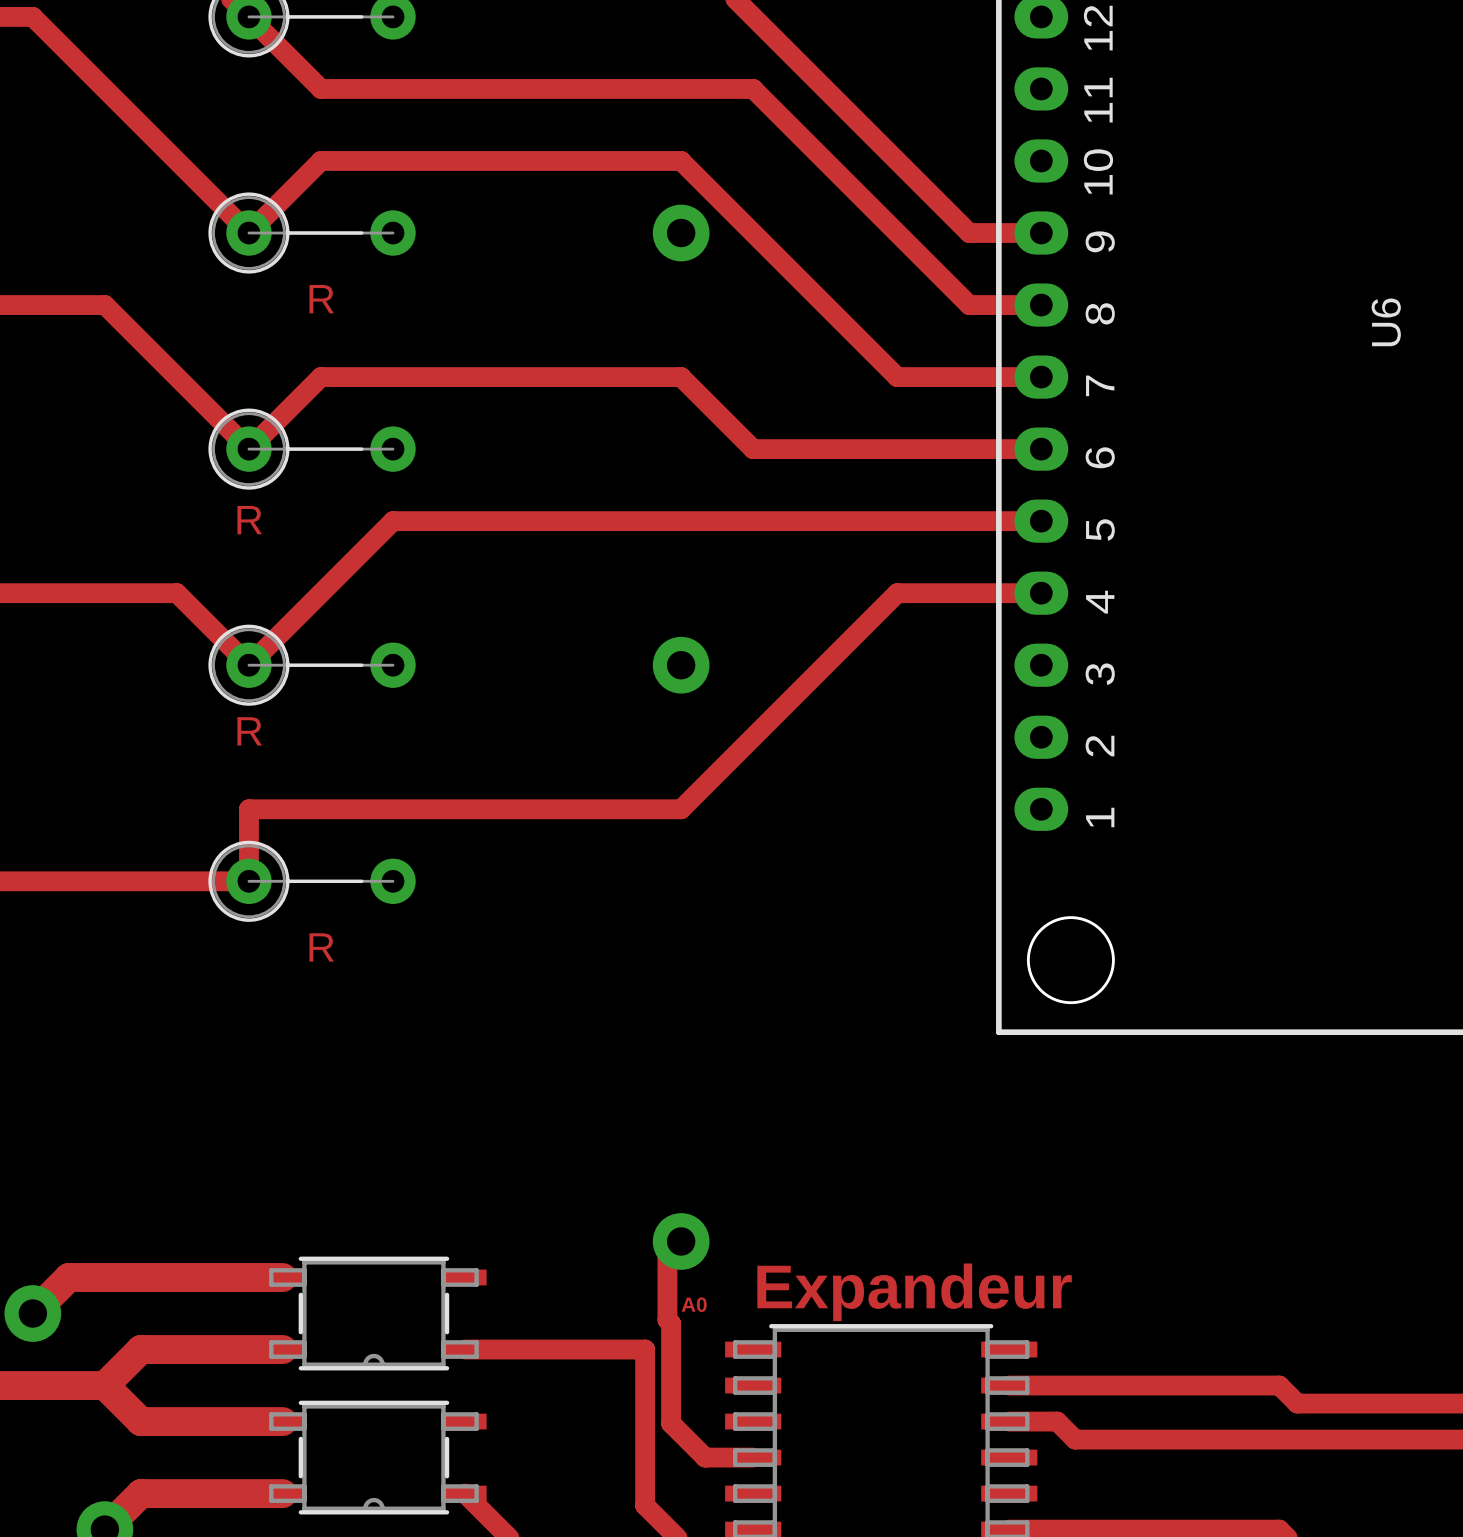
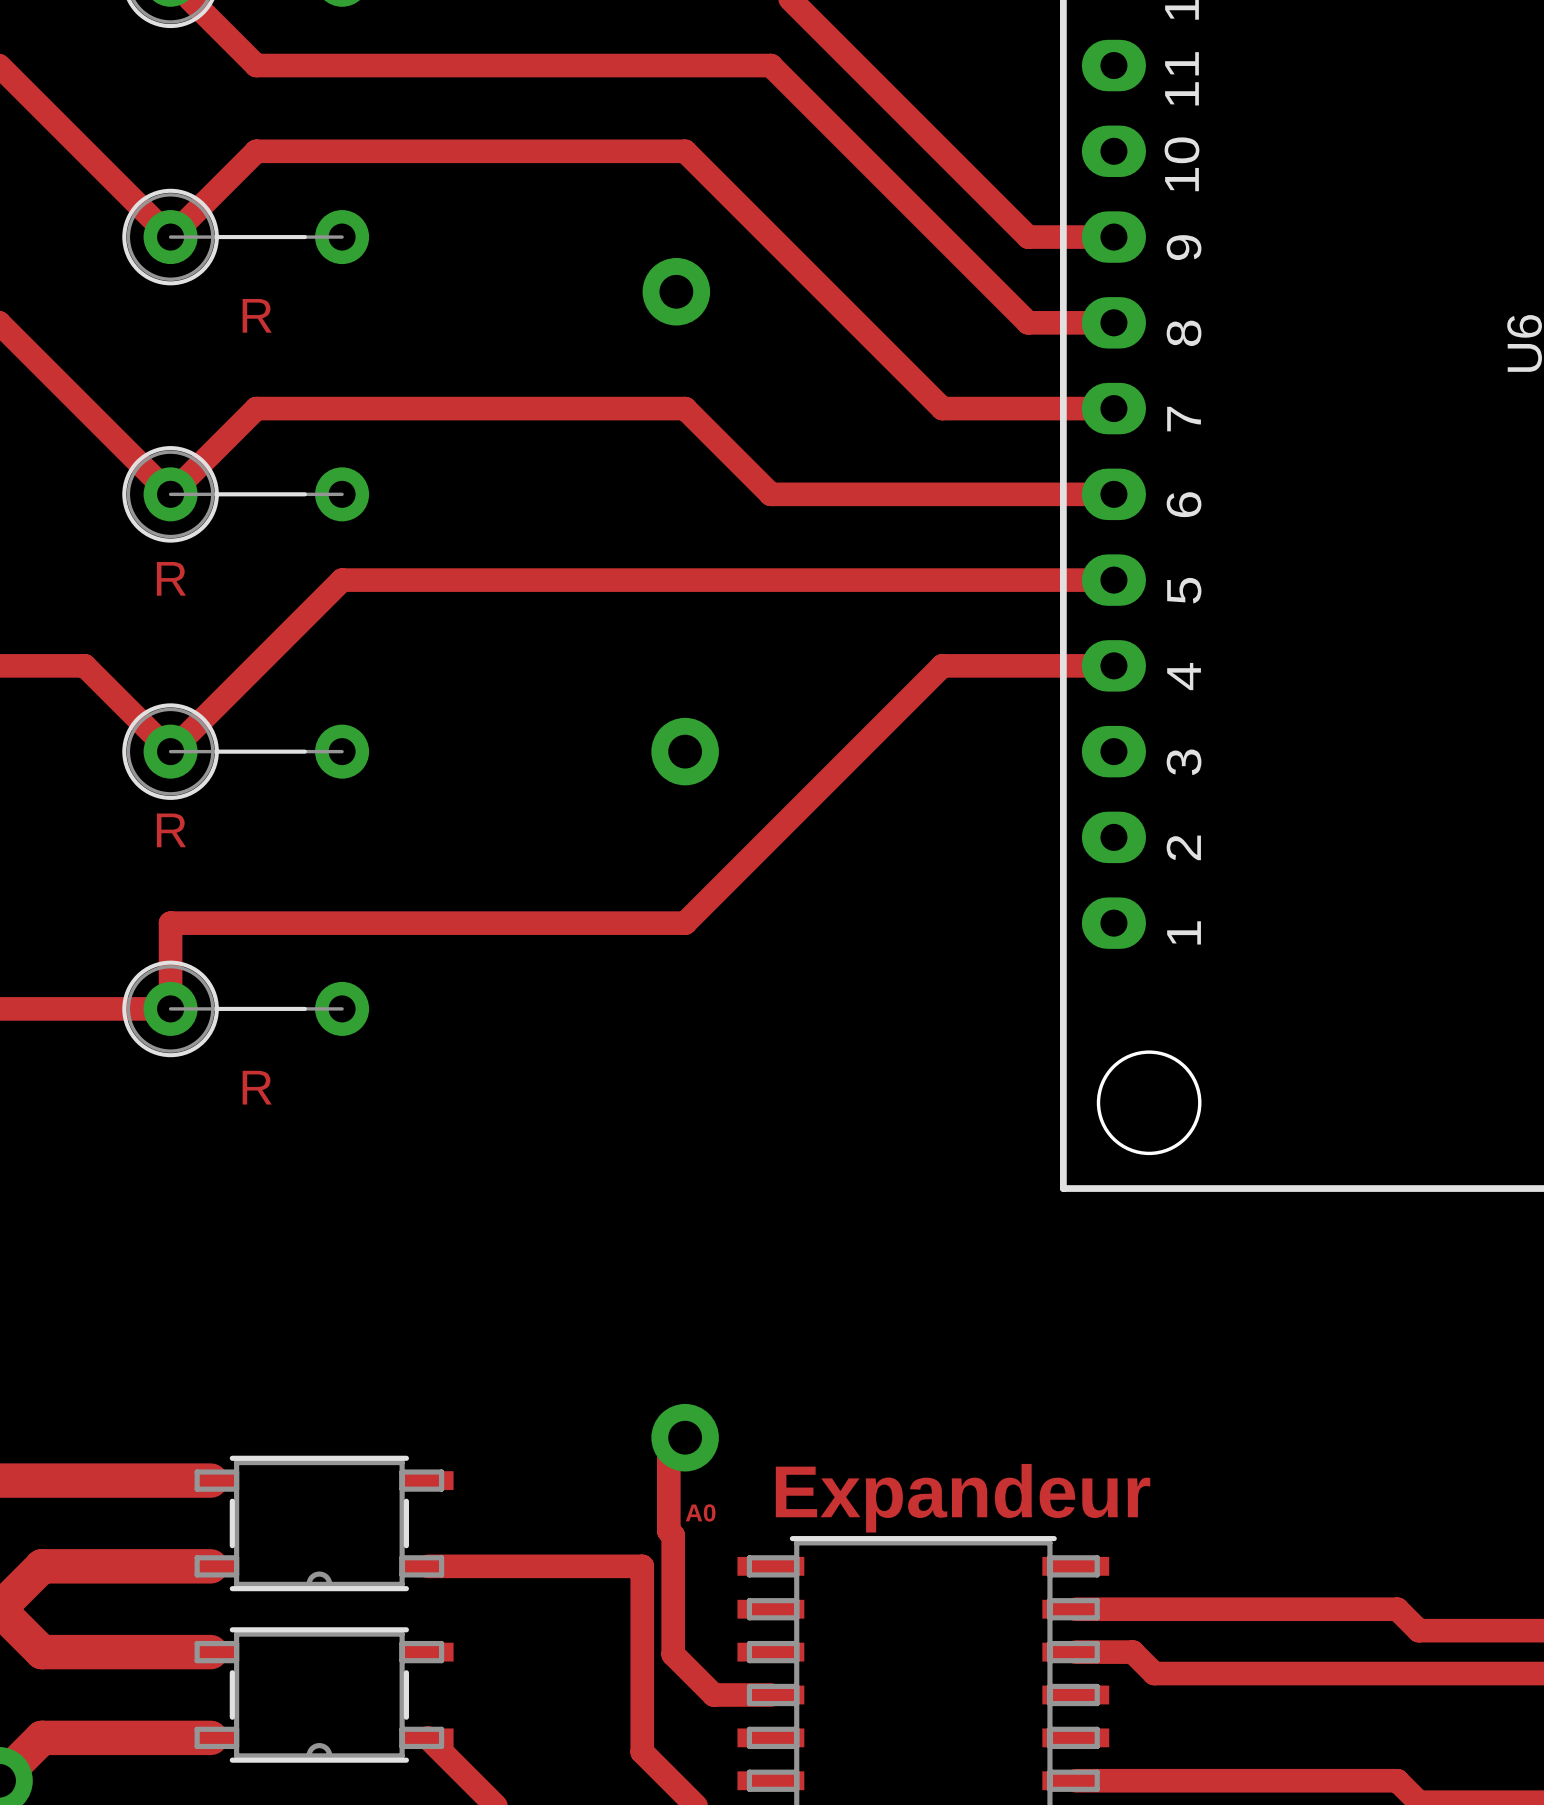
via position: (681, 233) -> (676, 291)

